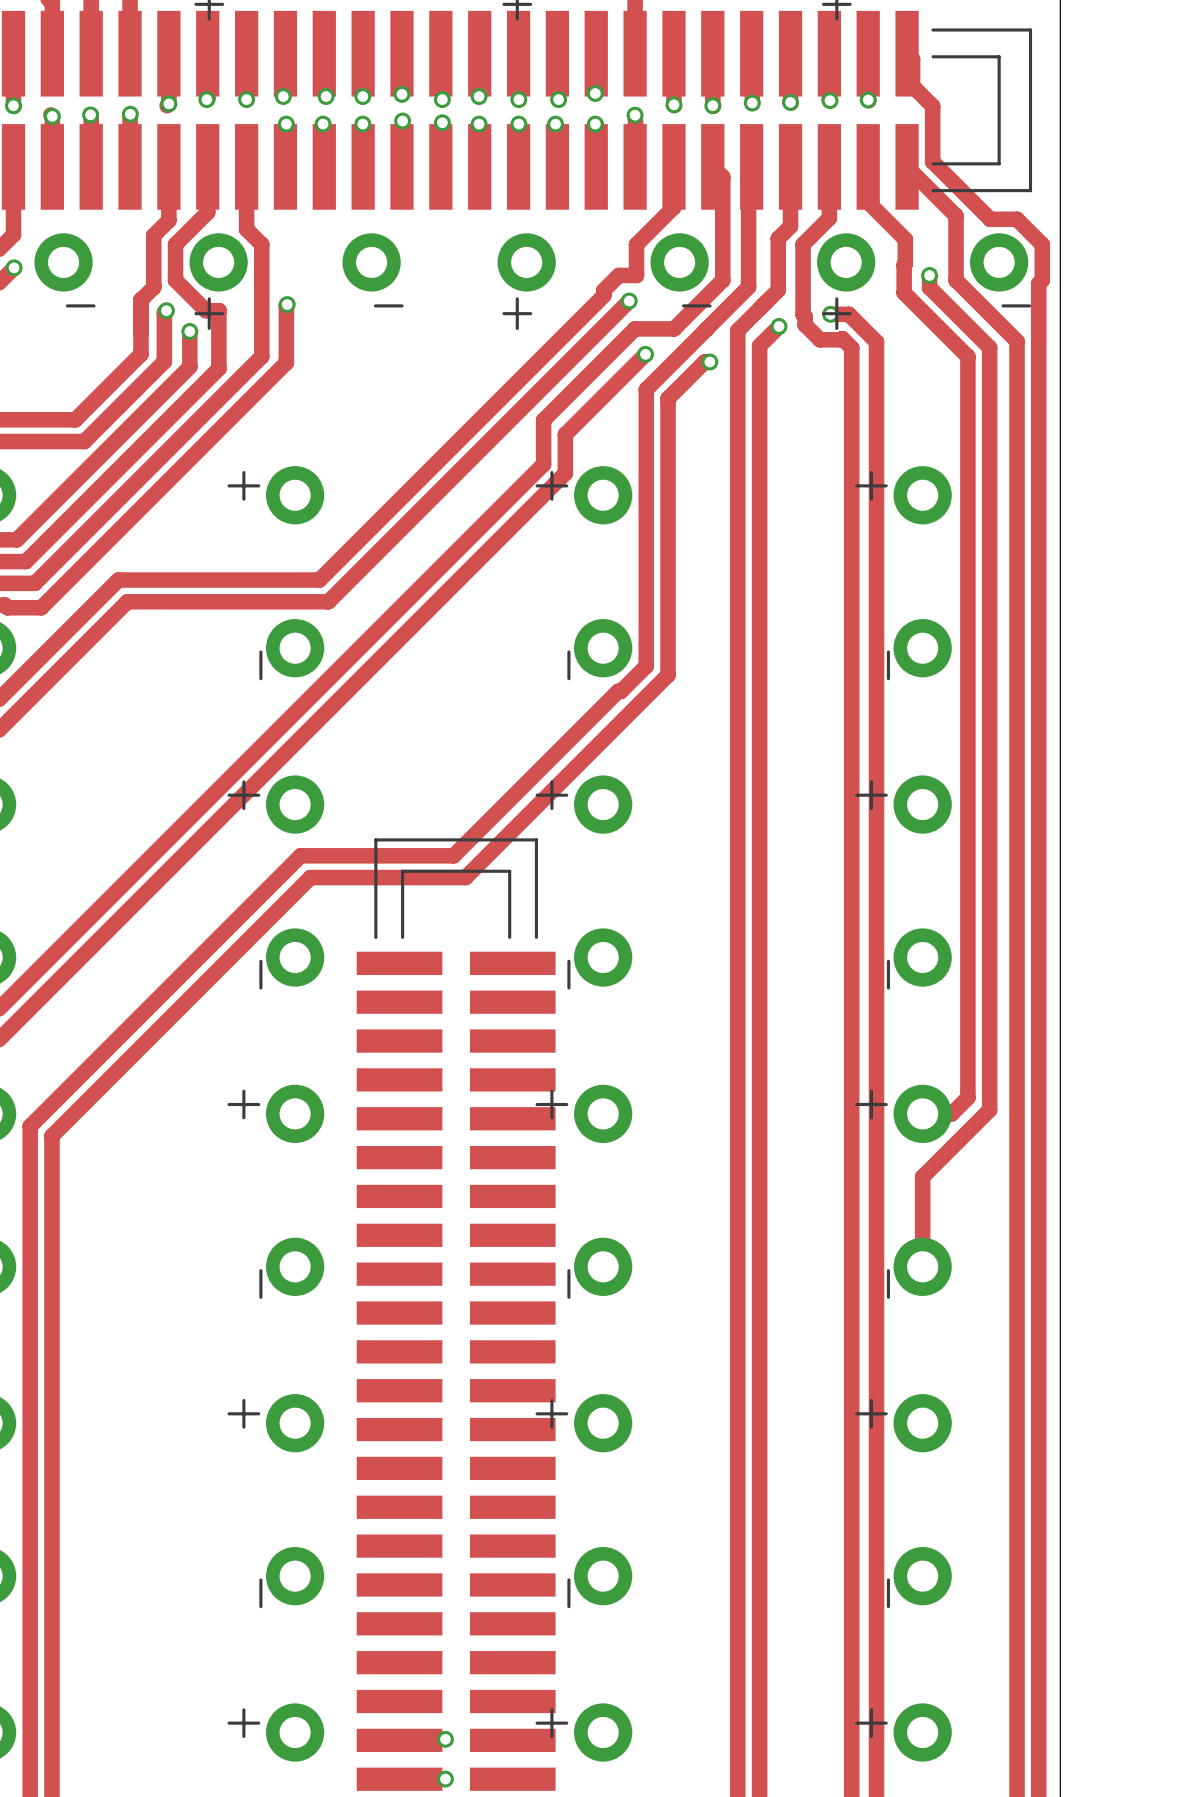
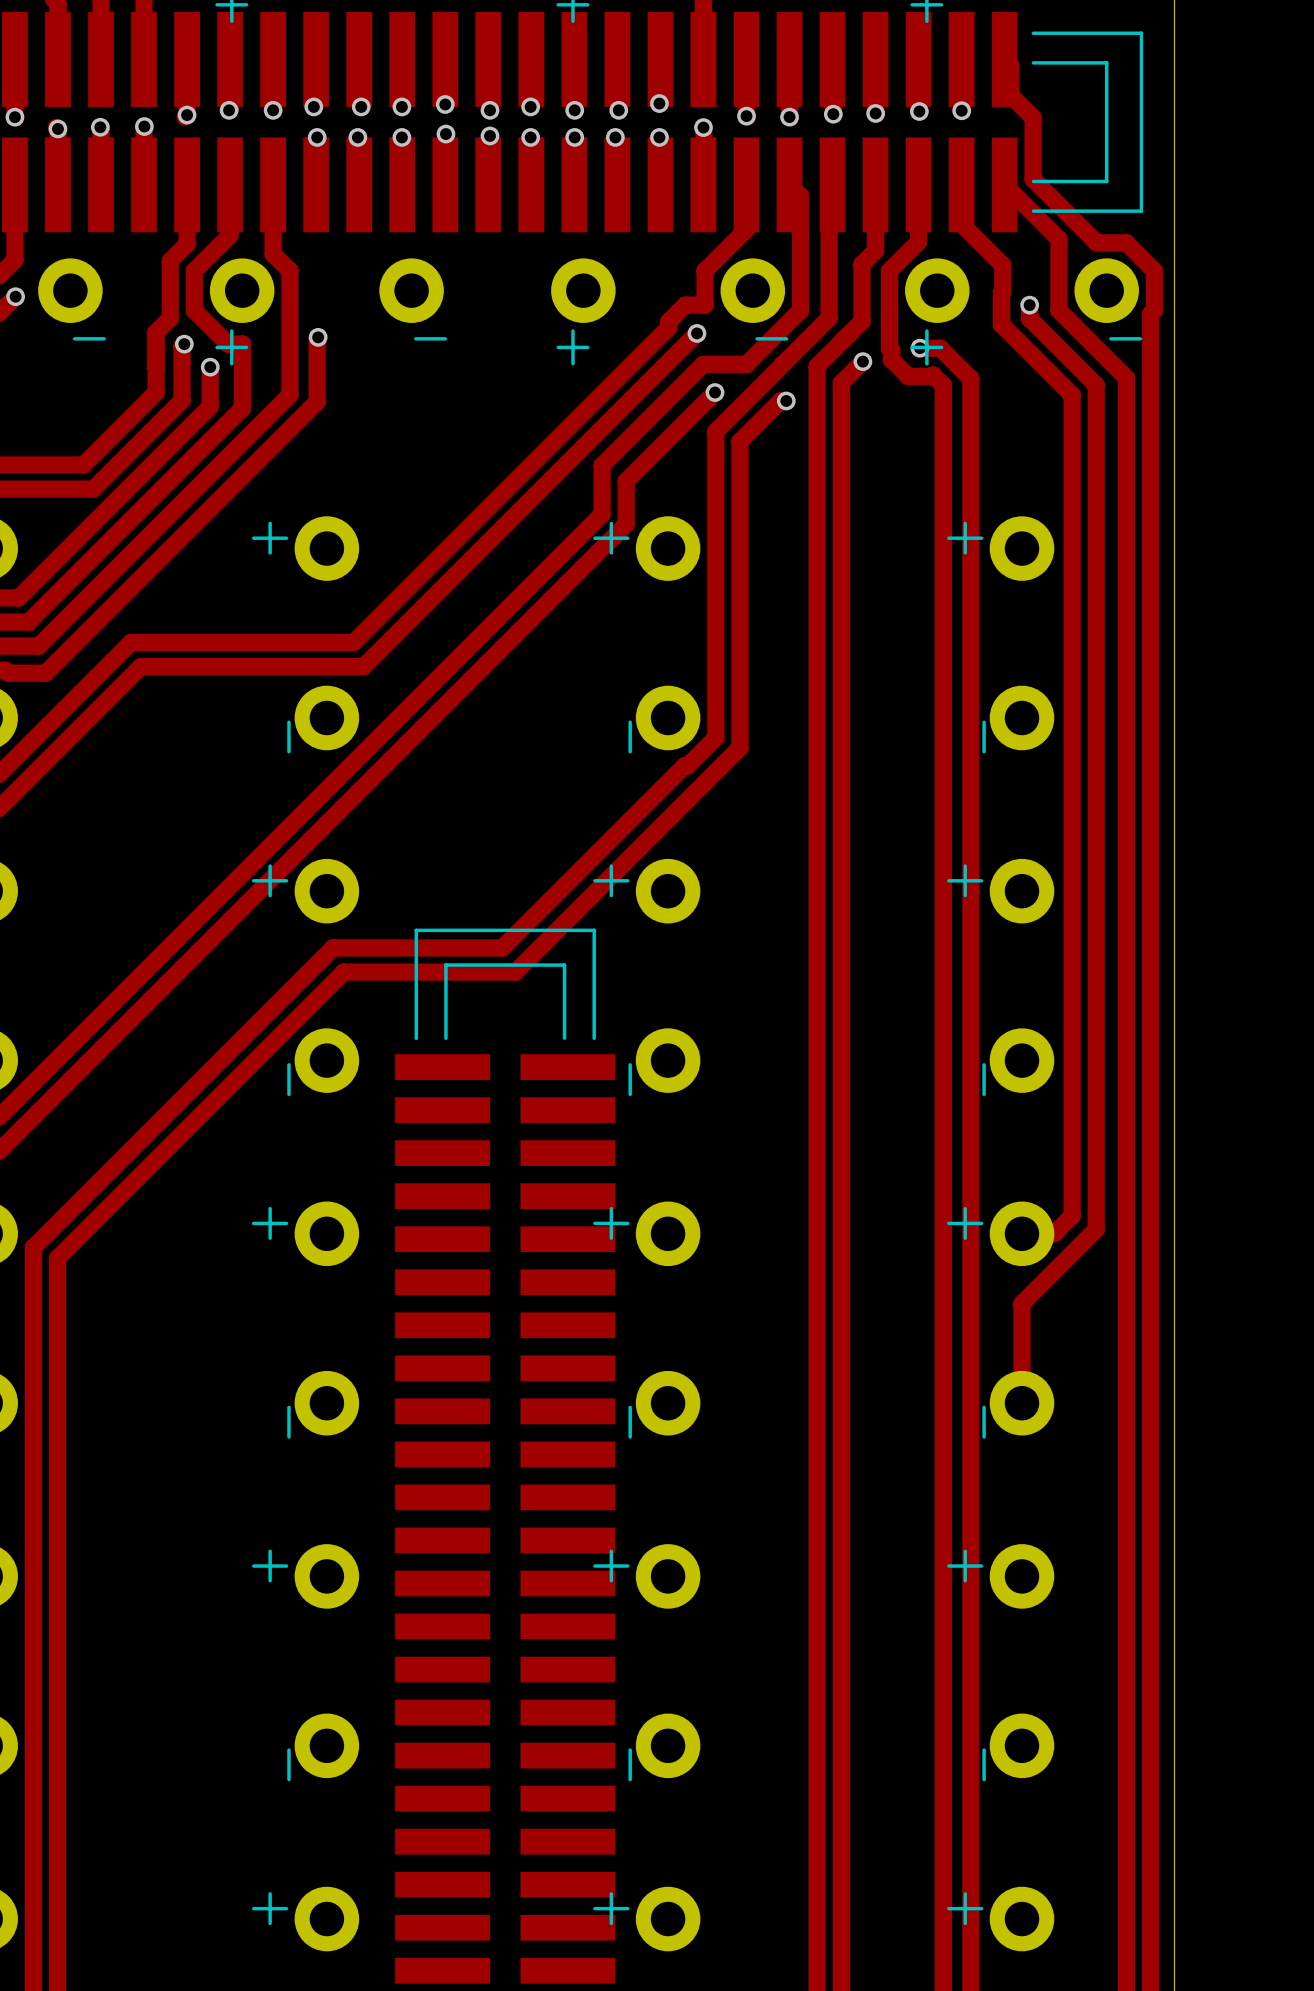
via: (445, 1739) -> none
via: (445, 1779) -> none

